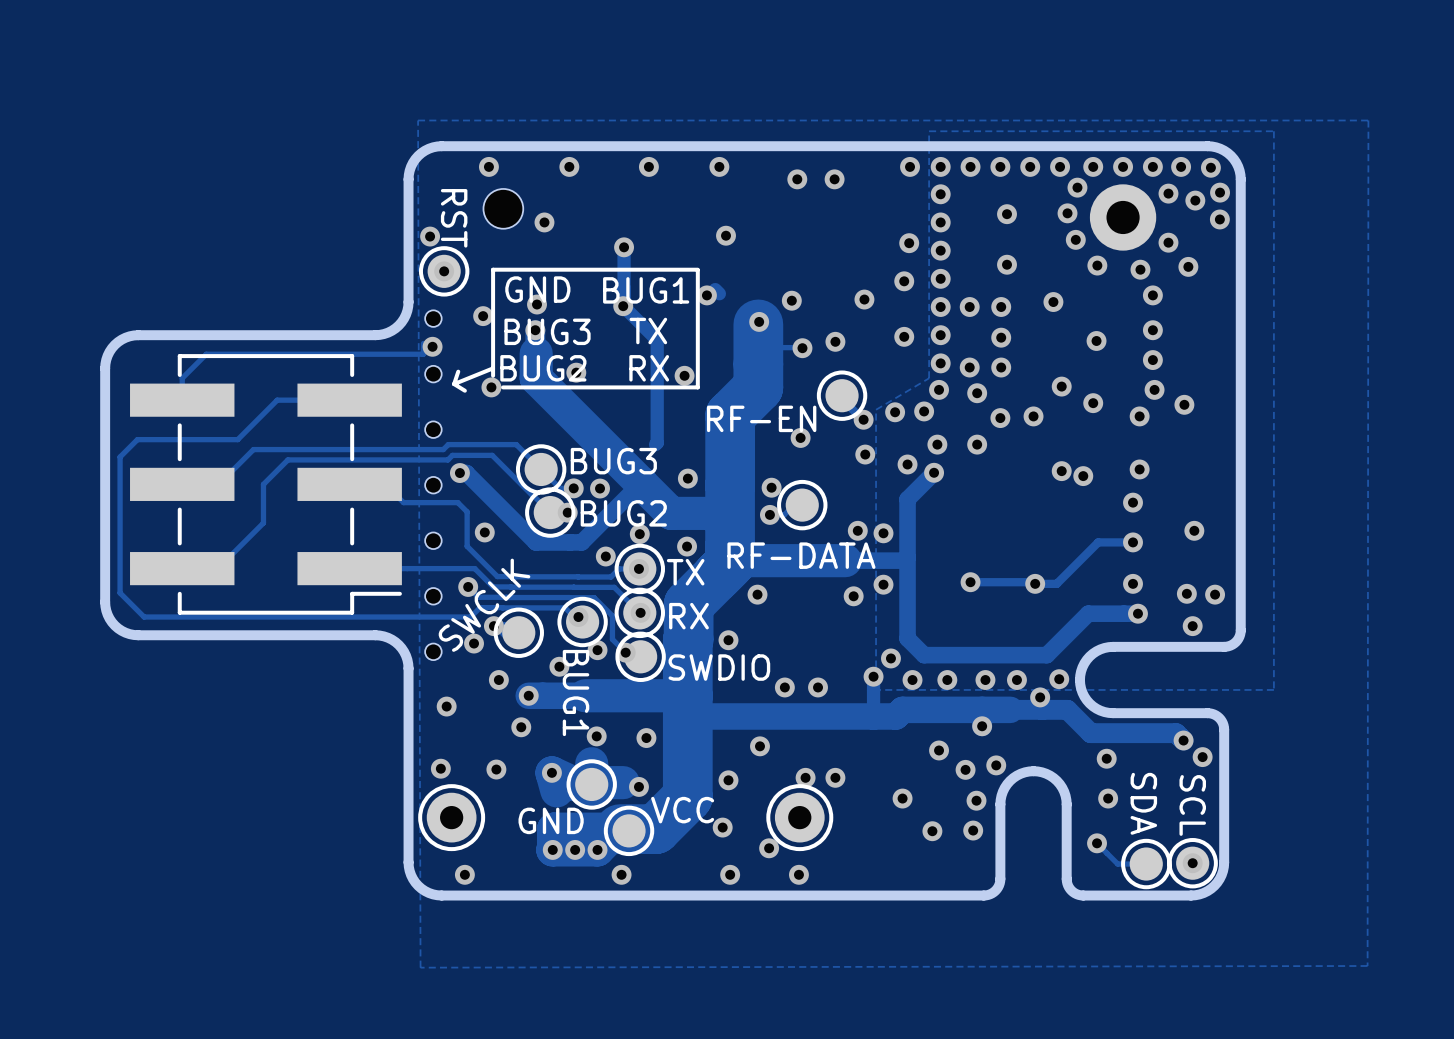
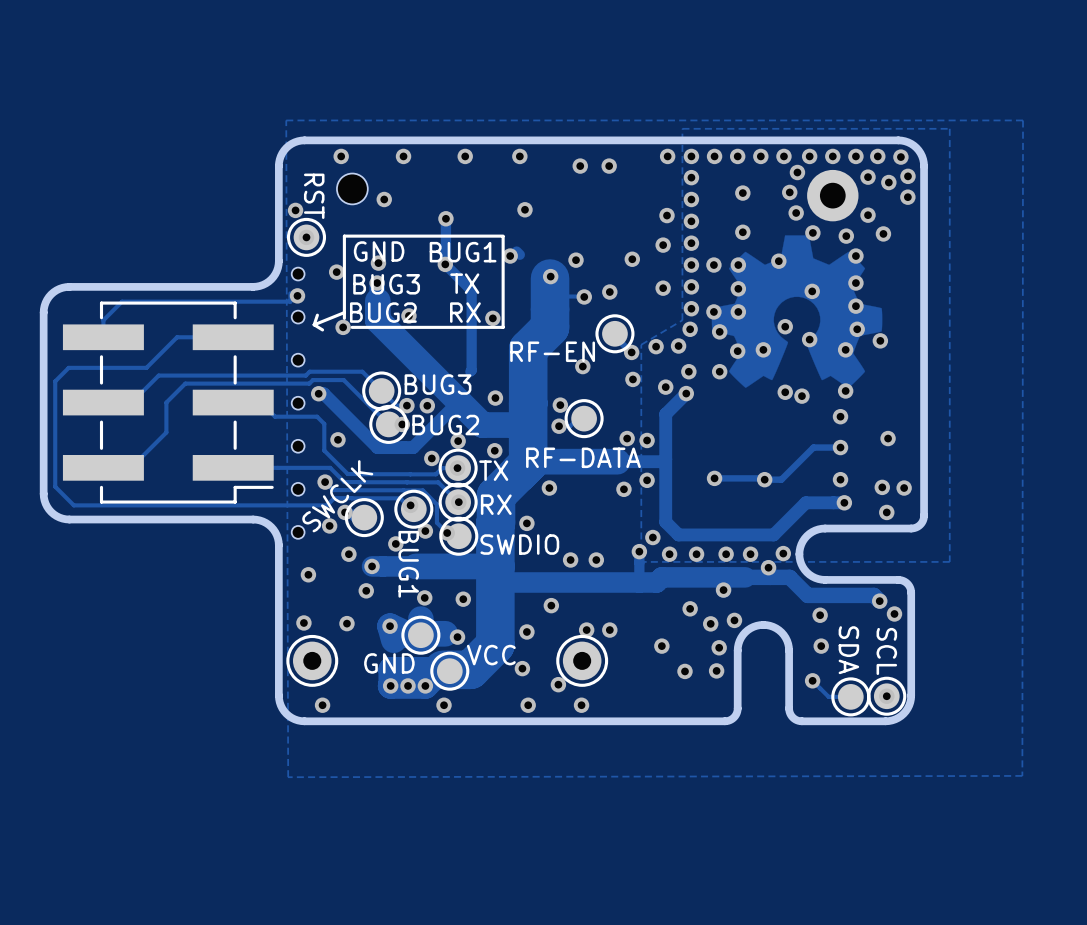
drawing: none -> [711, 235, 883, 388]

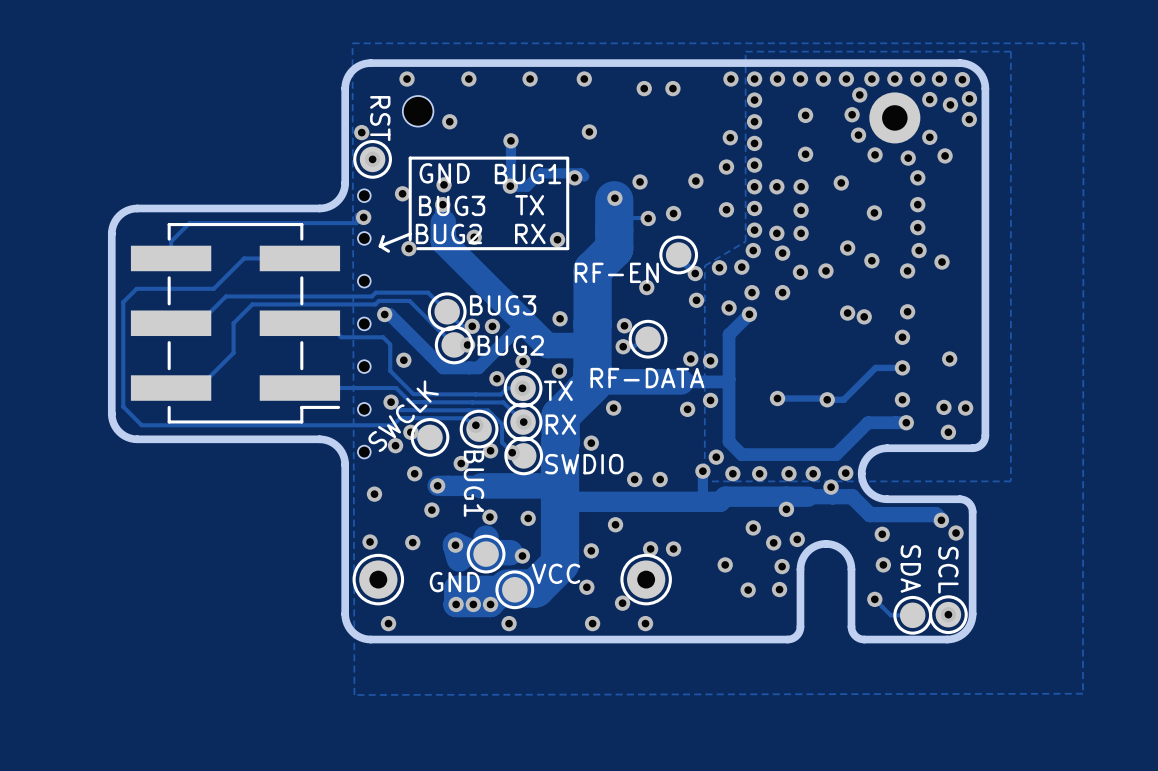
drawing: [711, 235, 883, 388] -> none
track: none -> (581, 173) (540, 173) (526, 186) (512, 186)
track: (445, 264) (471, 290) (470, 371) -> none

